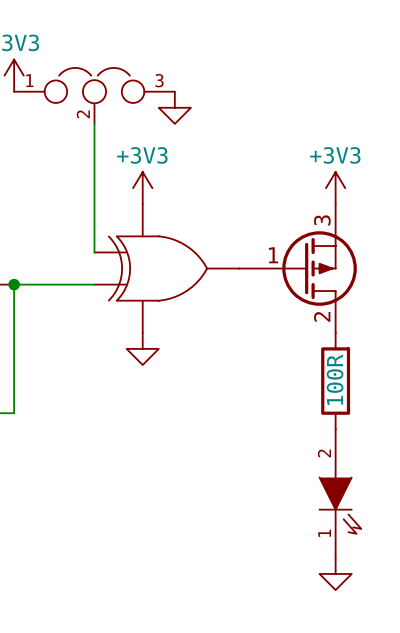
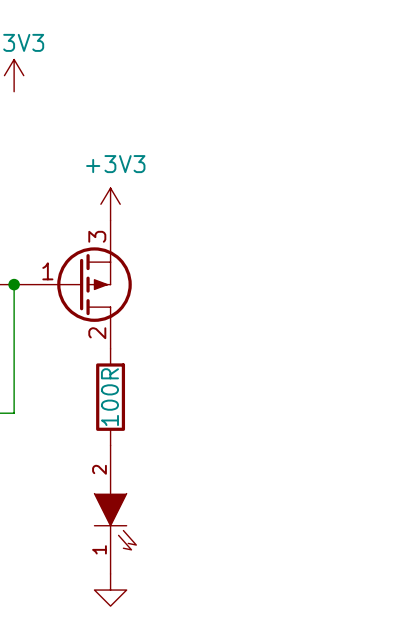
part: (94, 95) -> none
power symbol: (174, 107) -> none
wire: (94, 123) (94, 252) -> none
power symbol text position: +3V3 (142, 155) -> +3V3 (115, 164)
power symbol position: +3V3 (142, 188) -> +3V3 (110, 204)
power symbol: +3V3 (335, 188) -> none
part: (166, 268) -> none
part position: (298, 268) -> (72, 284)
power symbol: (142, 348) -> none
part position: (335, 381) -> (110, 397)
part position: (340, 493) -> (115, 509)
power symbol: (335, 573) -> none
power symbol: none -> (110, 590)

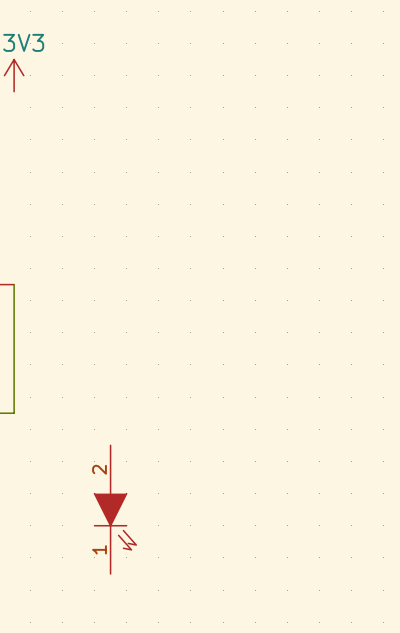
power symbol: +3V3 (110, 204) -> none
junction: (14, 284) -> none
part: (72, 284) -> none
part: 100R (110, 397) -> none
power symbol: (110, 590) -> none

